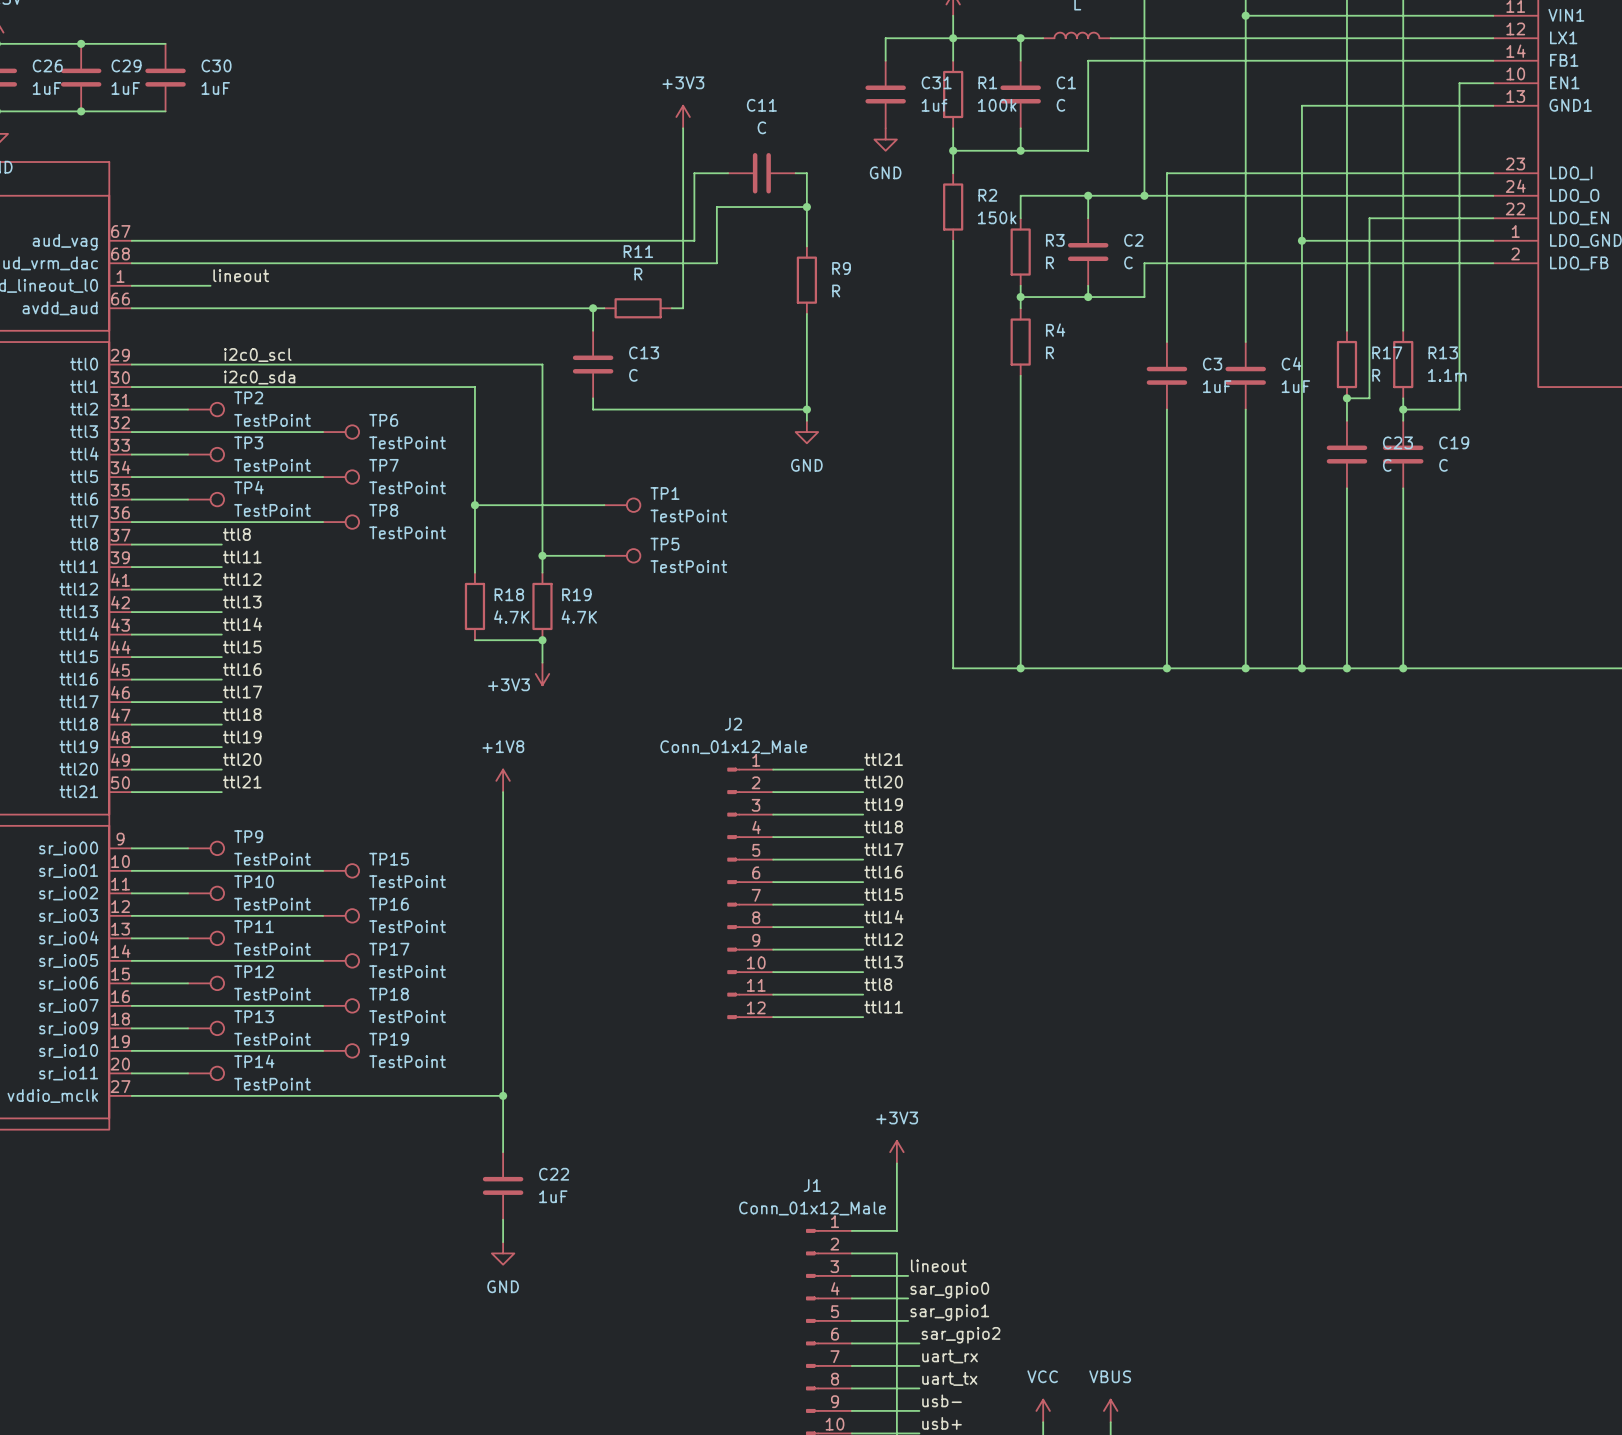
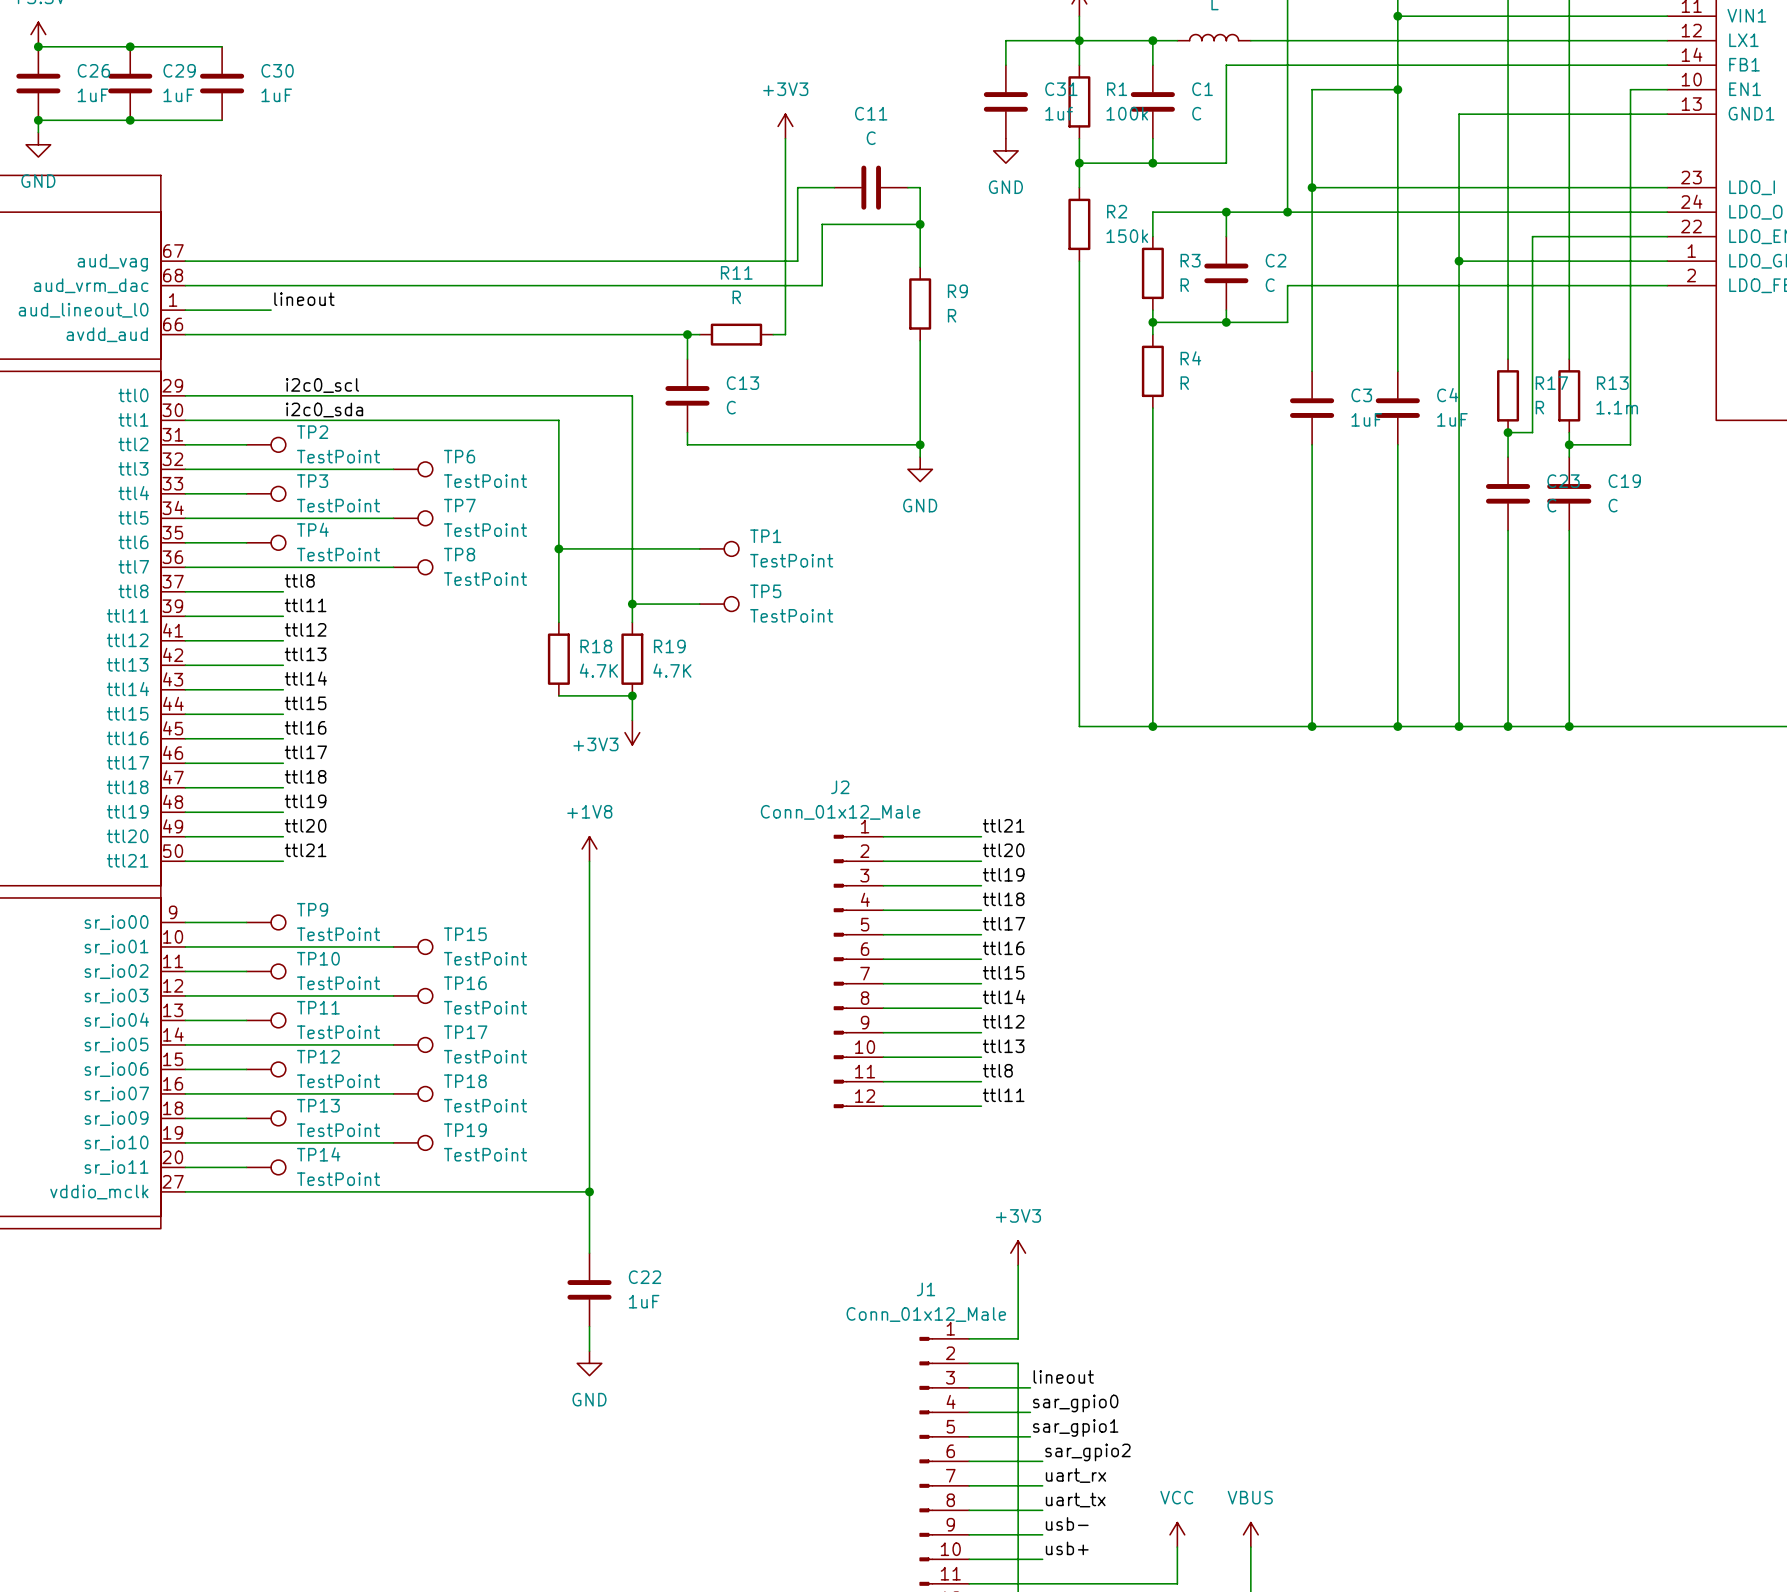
wire: none -> (1397, 89) (1312, 89) (1312, 187)
junction: none -> (1397, 89)
junction: none -> (1312, 187)

